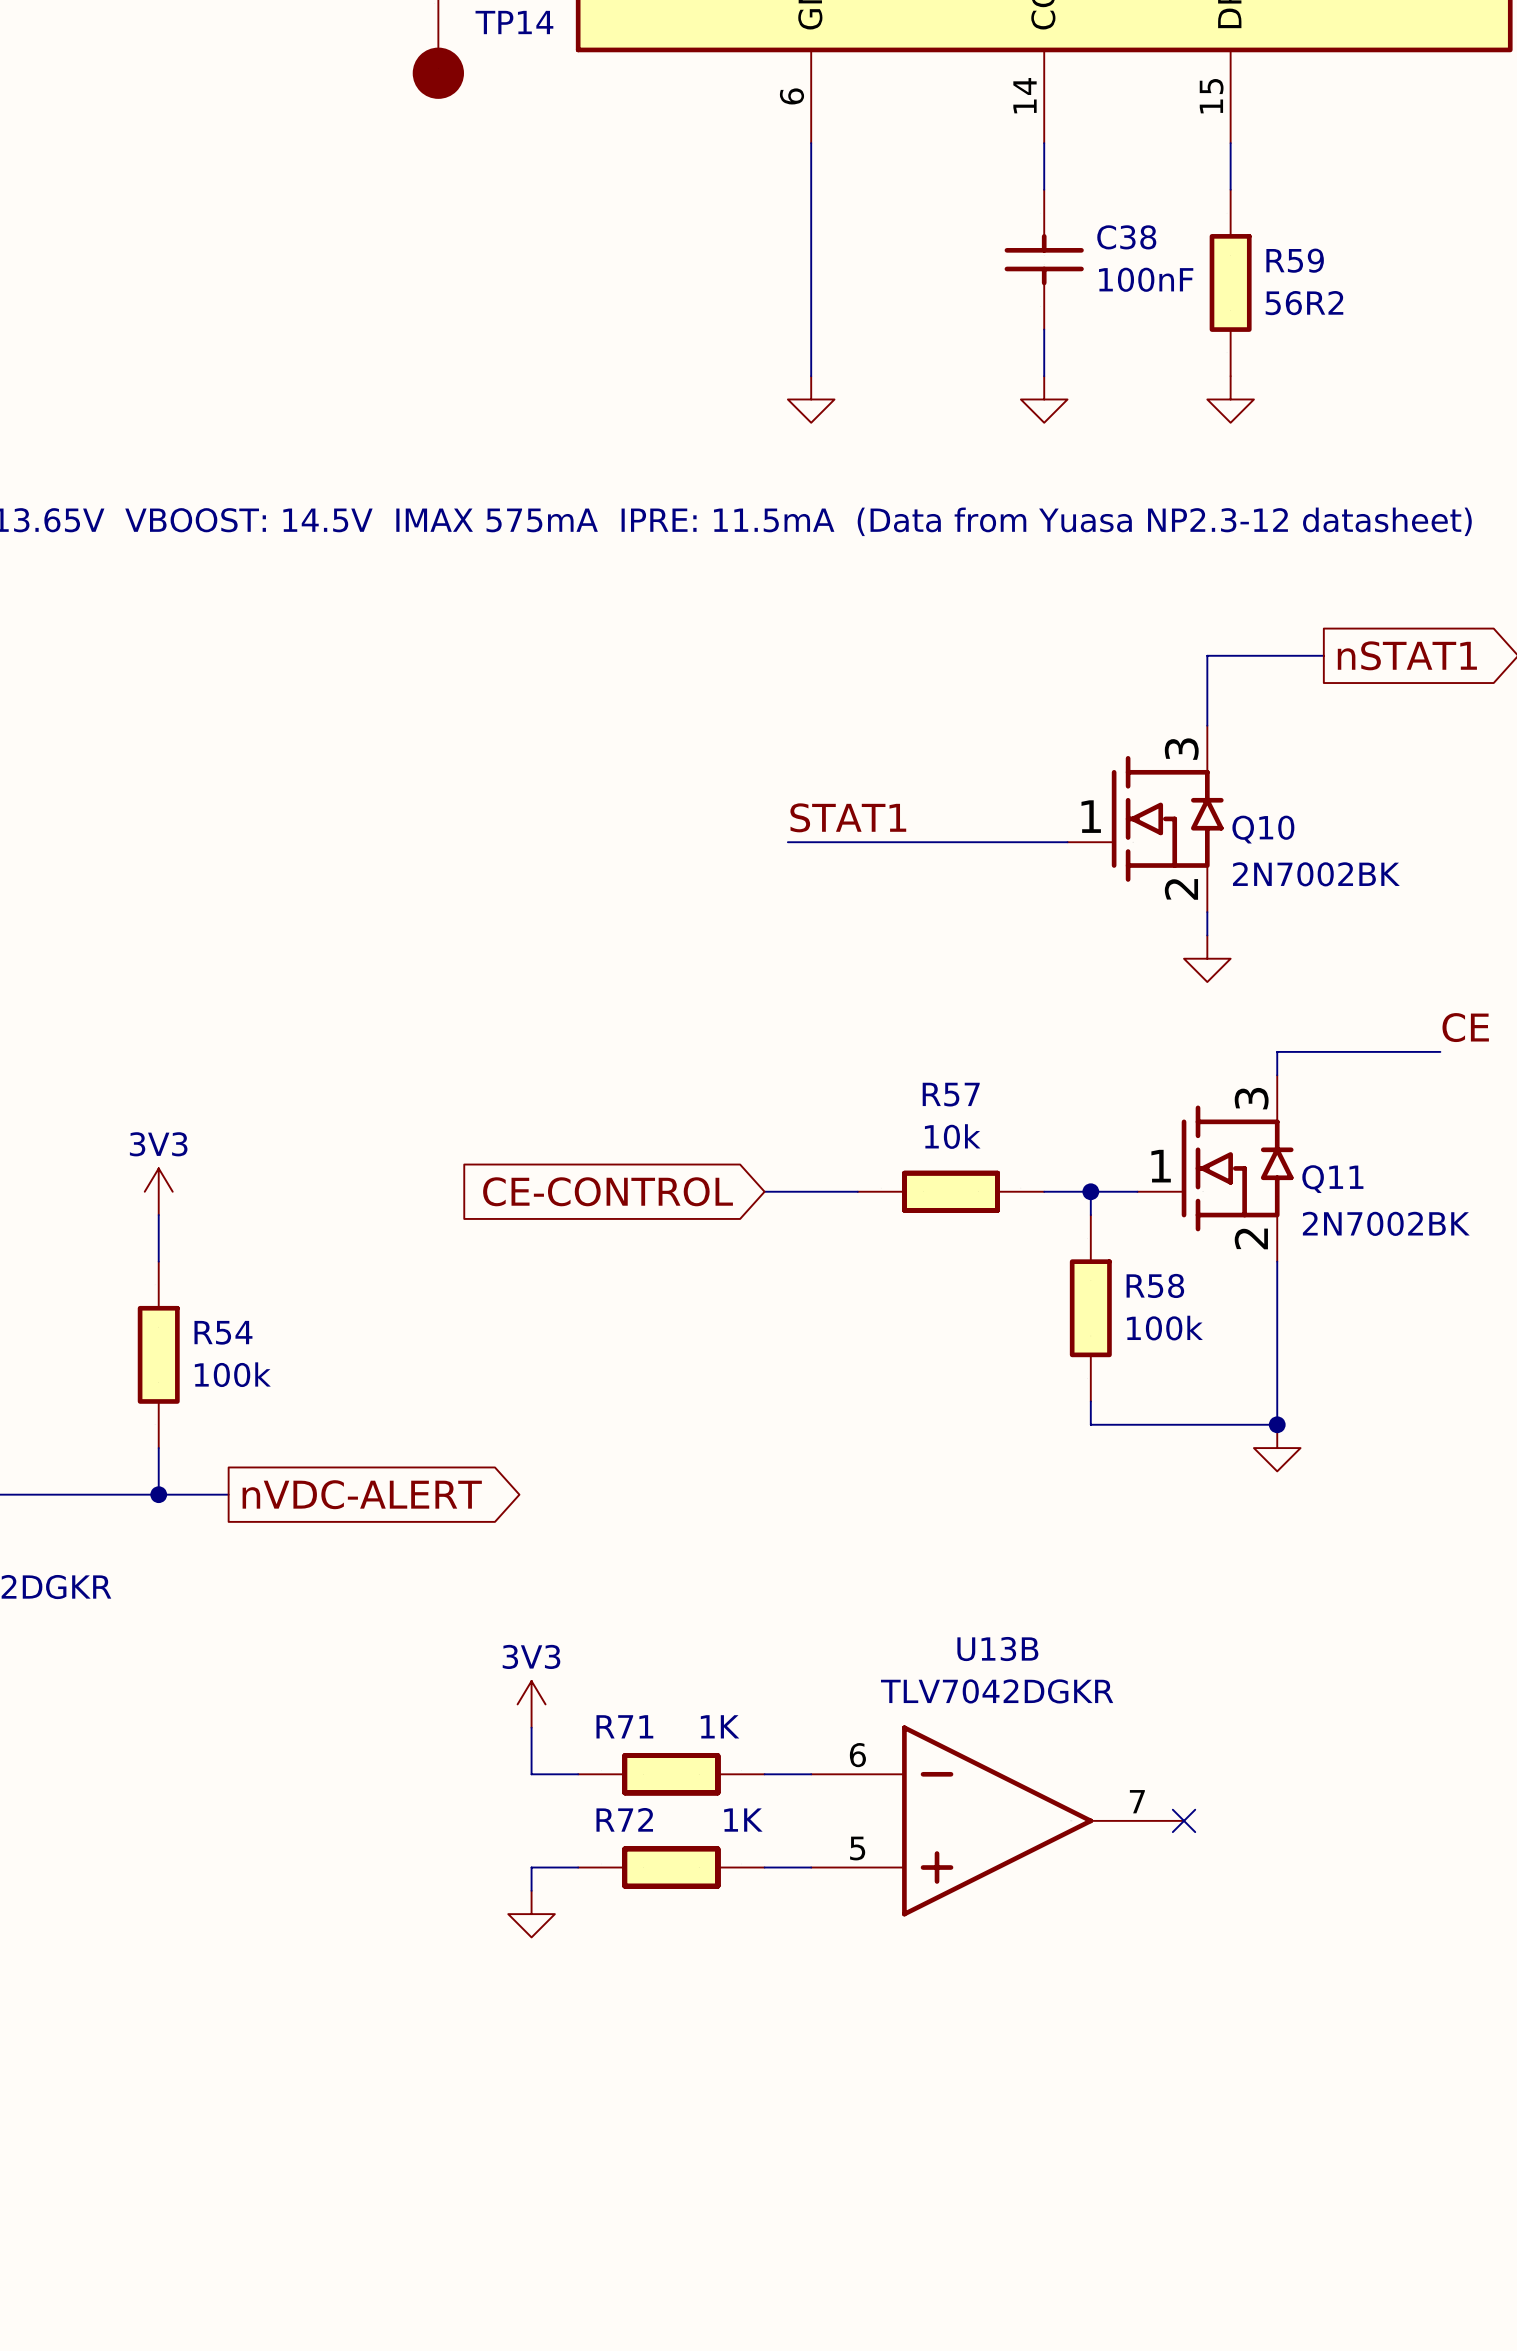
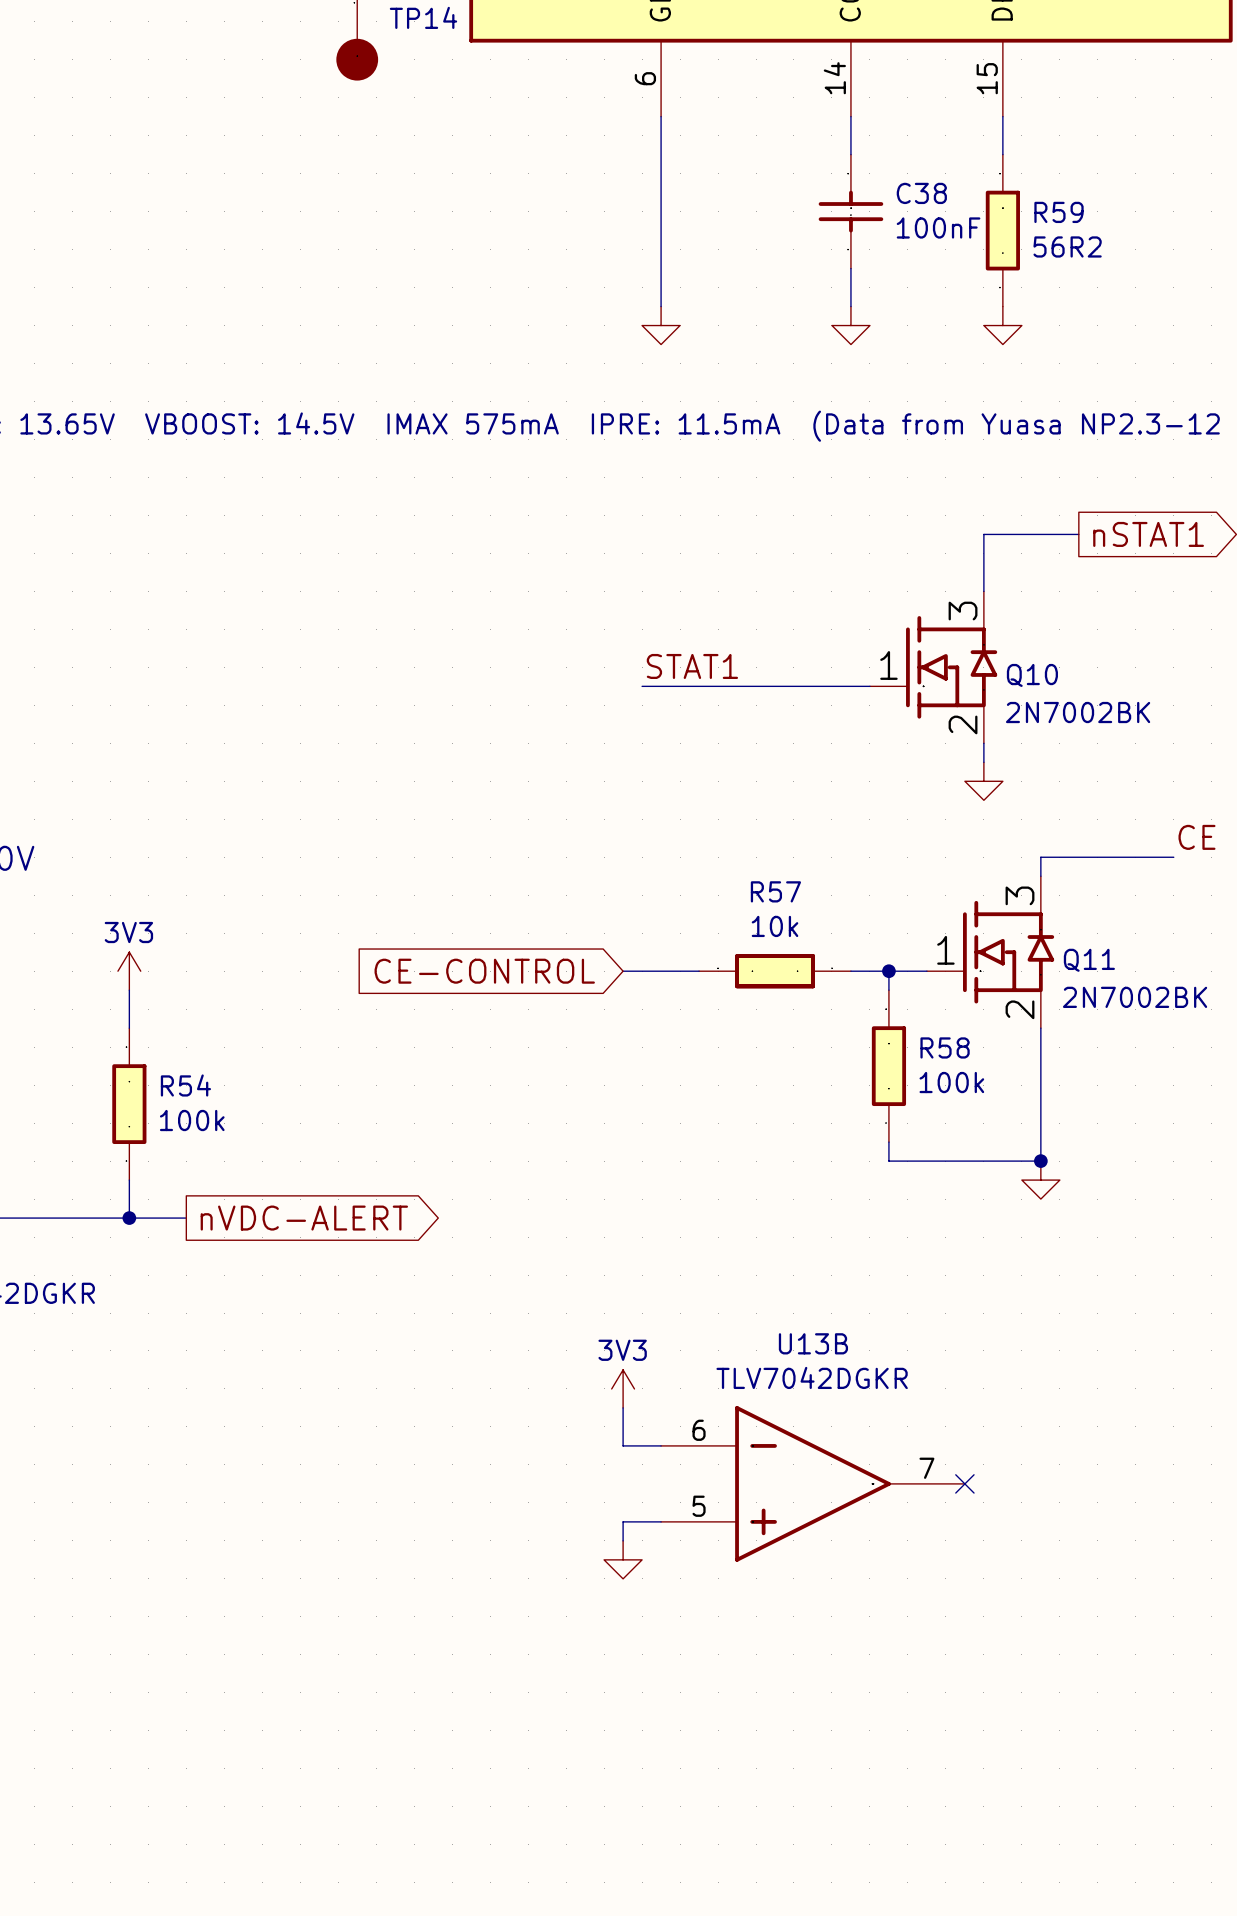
power symbol position: 3V3 (531, 1704) -> 3V3 (623, 1388)
wire: (531, 1727) (531, 1774) (578, 1774) -> none
wire: none -> (623, 1407) (623, 1445)
R71: (671, 1774) -> none
wire: (578, 1867) (531, 1867) (531, 1890) -> none
R72: (671, 1867) -> none
wire: none -> (623, 1521) (623, 1540)
power symbol position: (531, 1914) -> (623, 1559)

